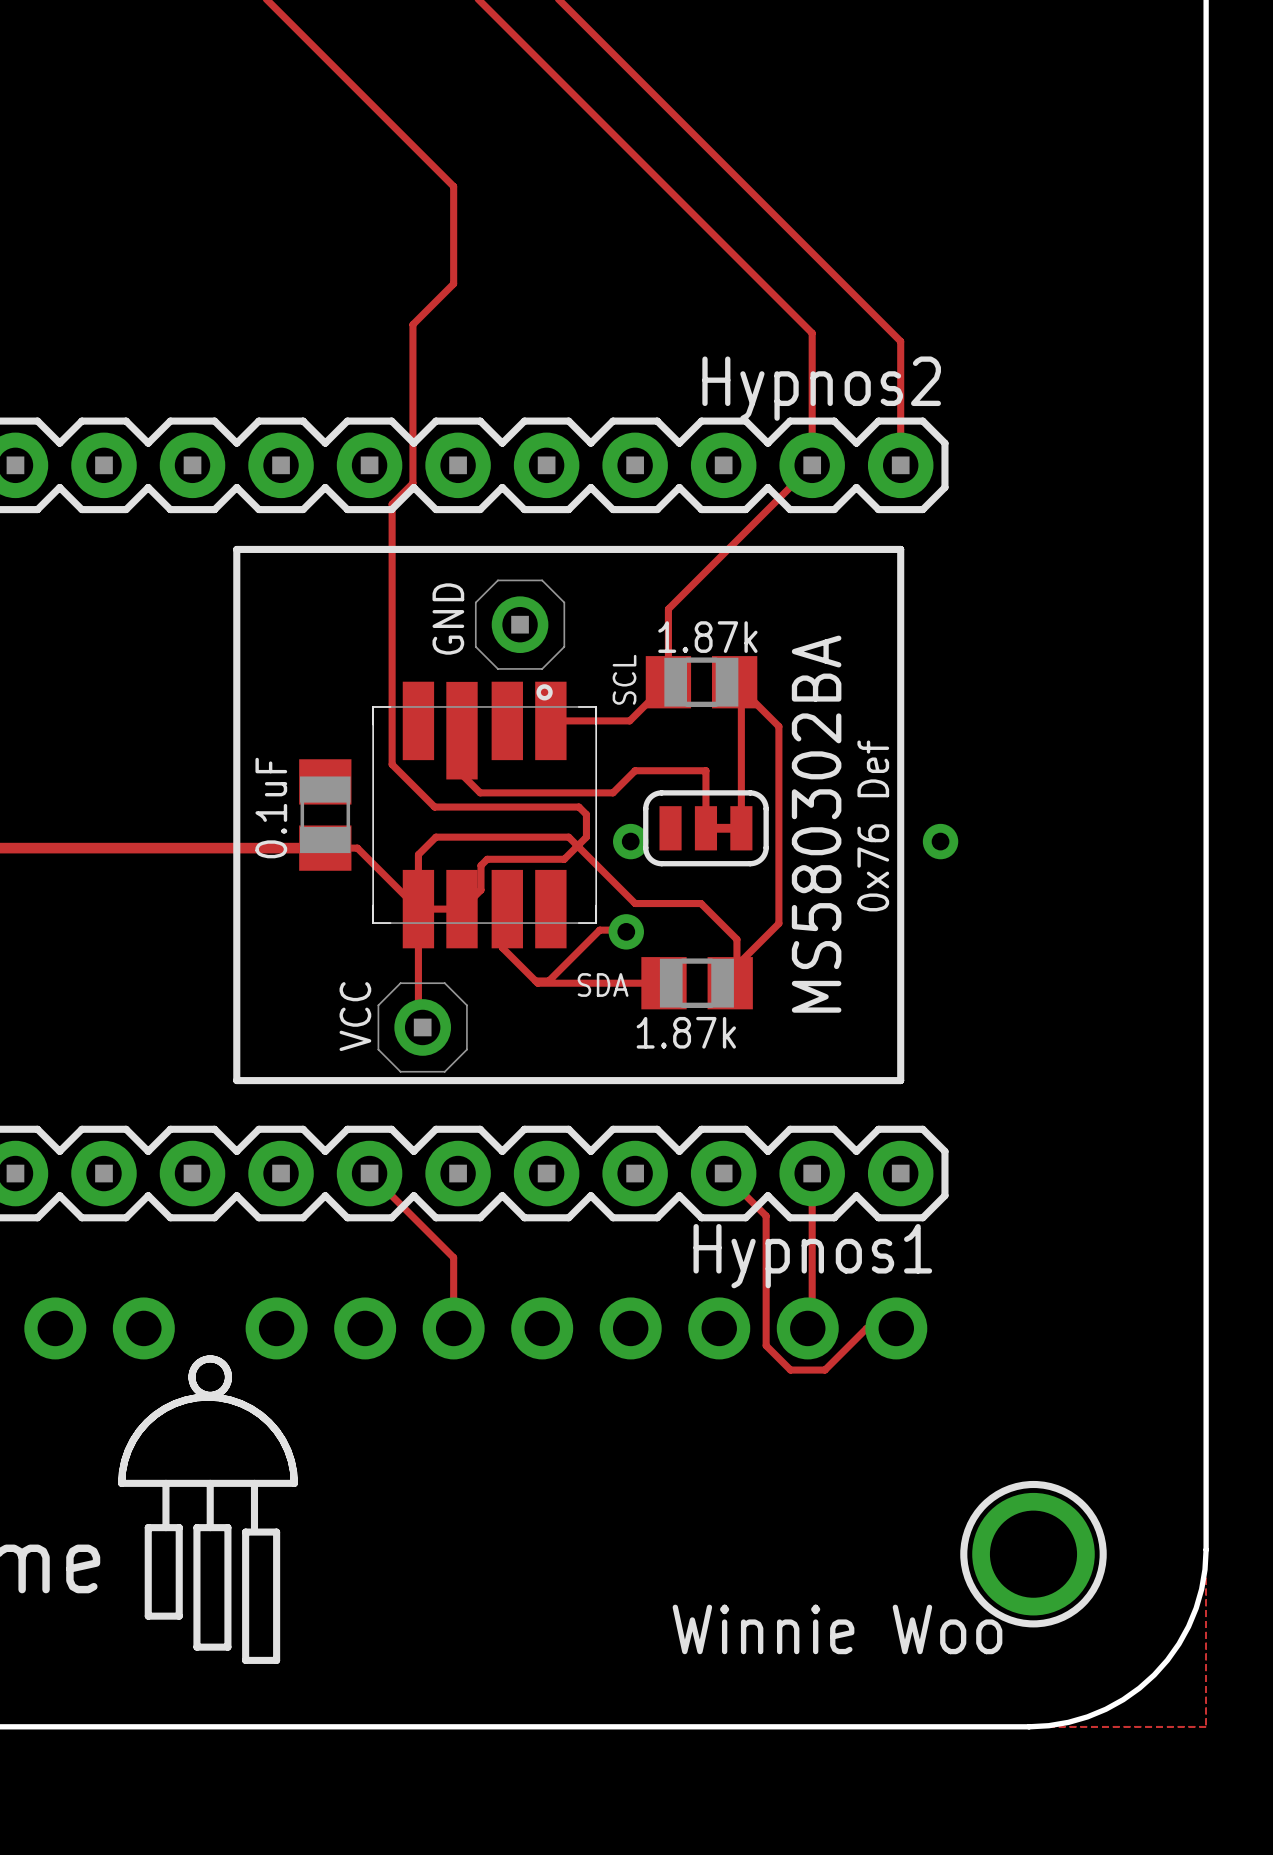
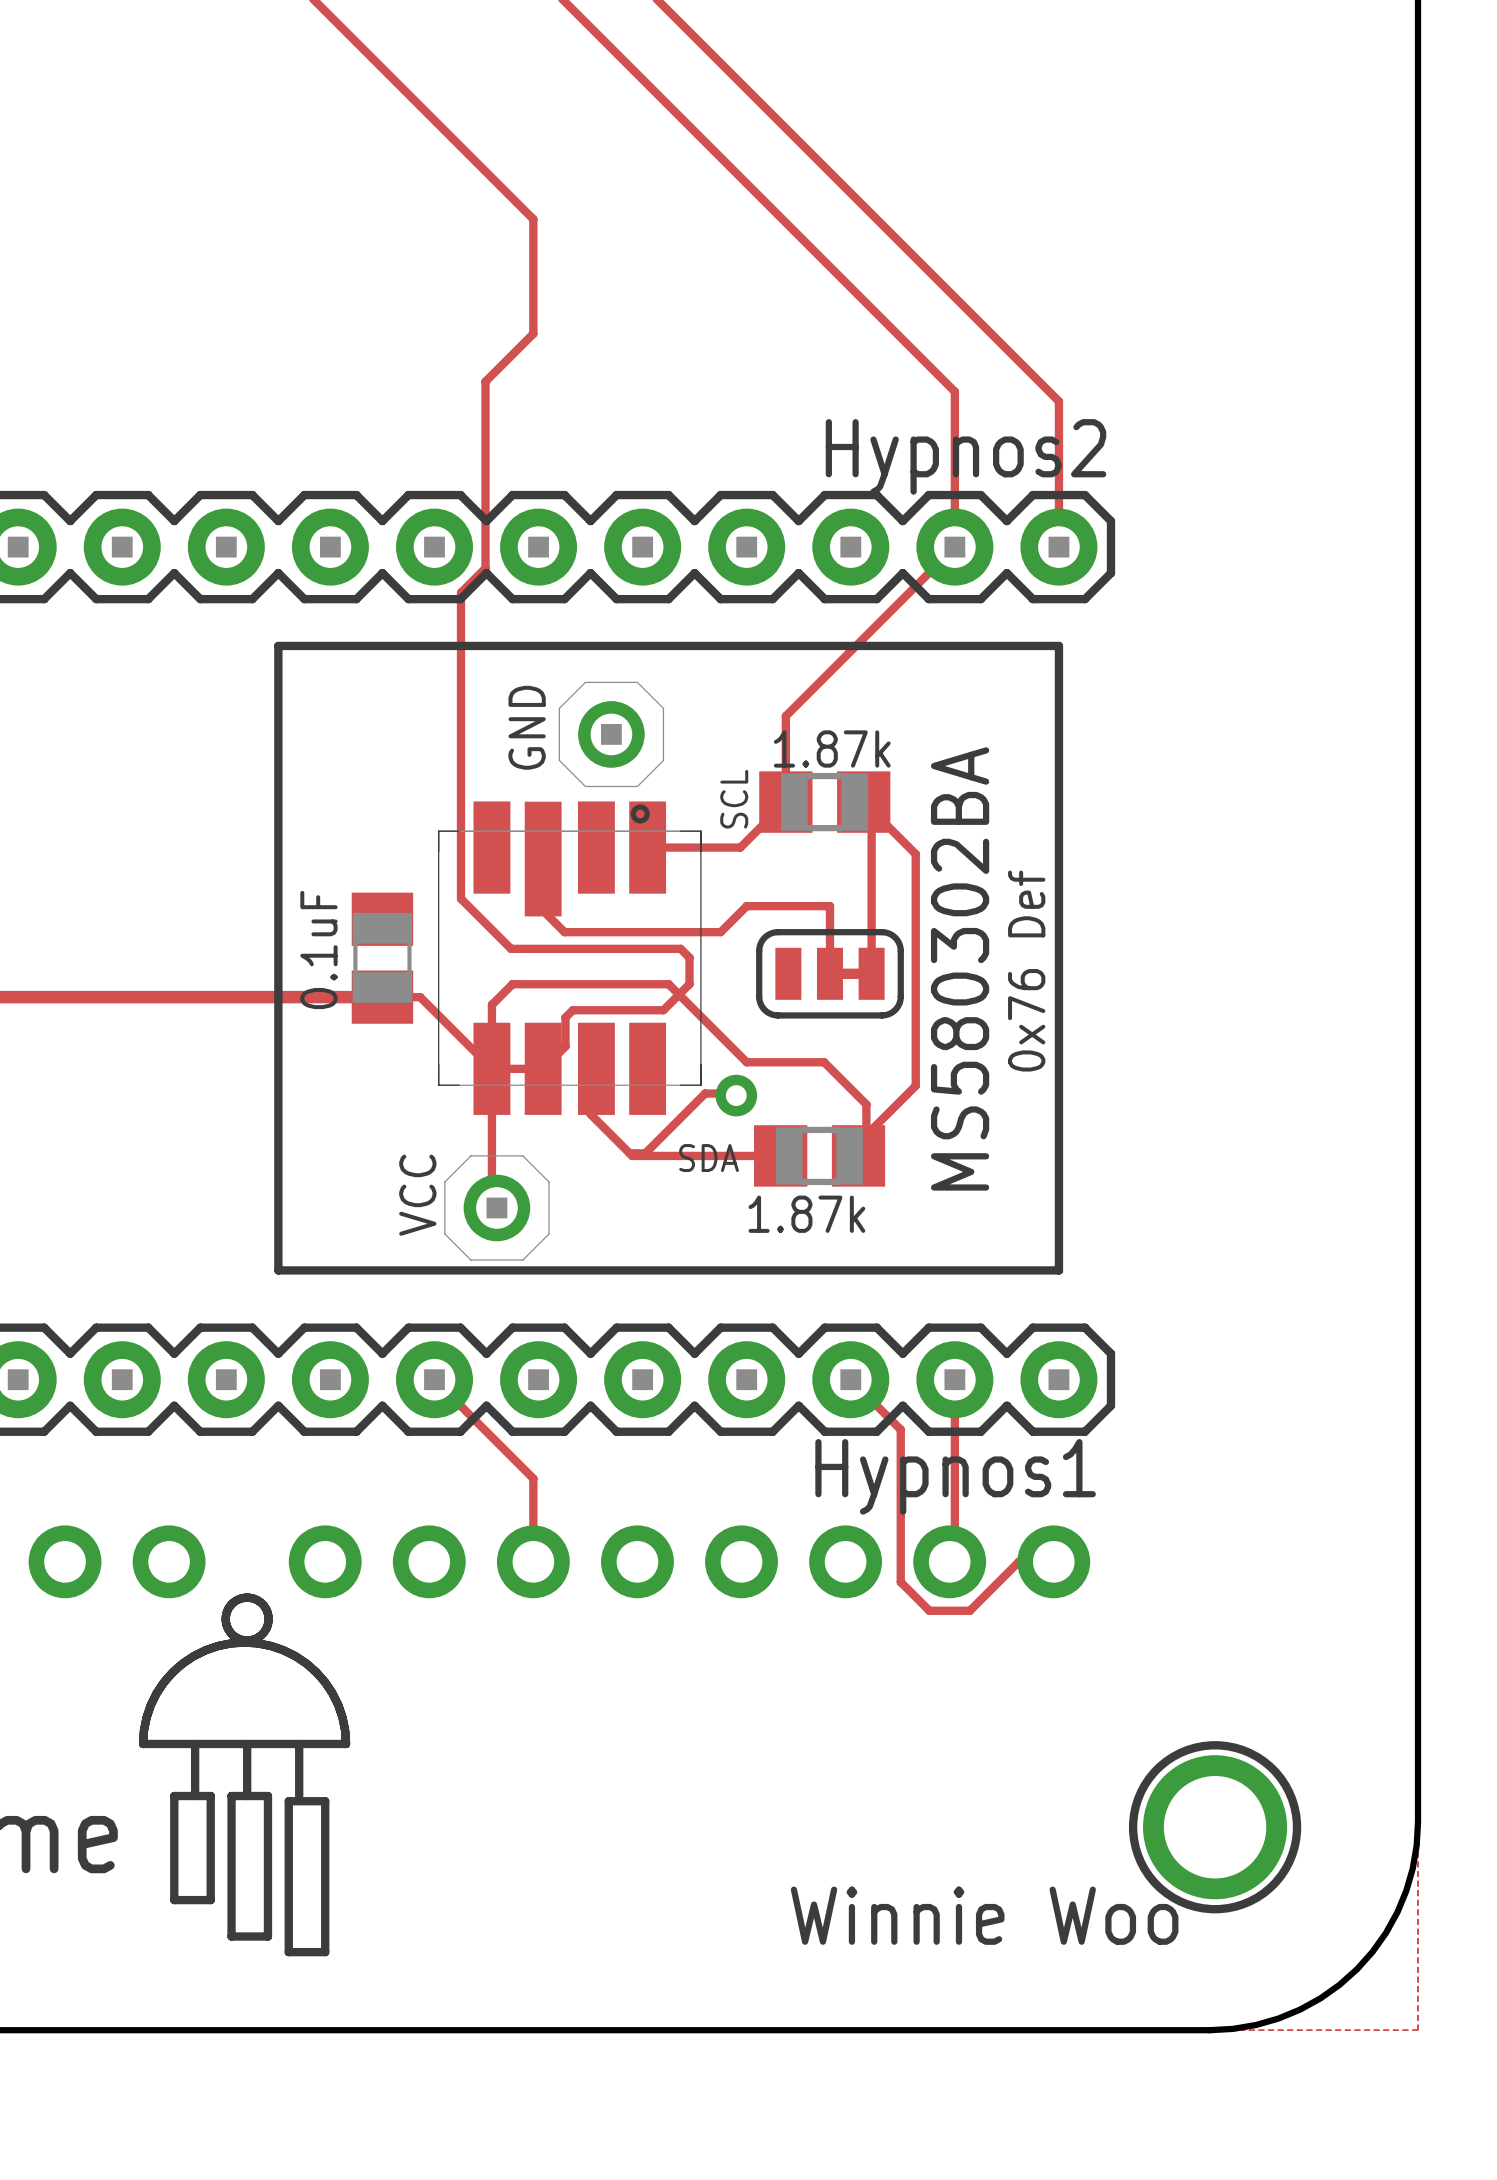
via: (630, 841) -> none
via: (940, 841) -> none

